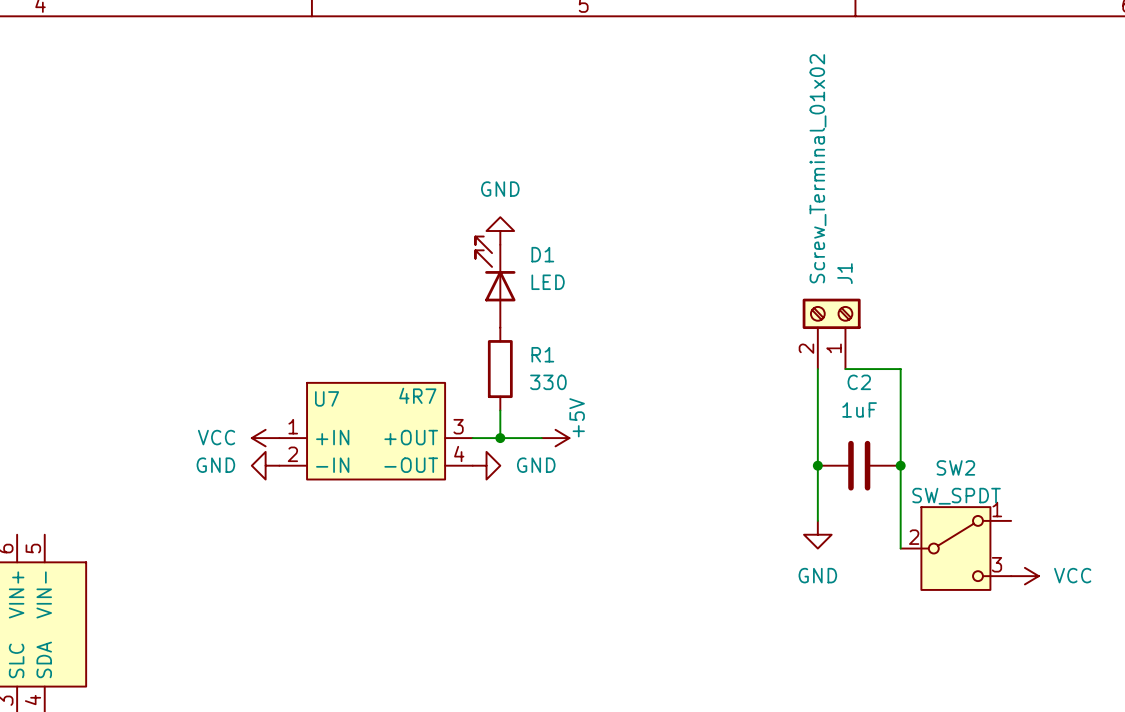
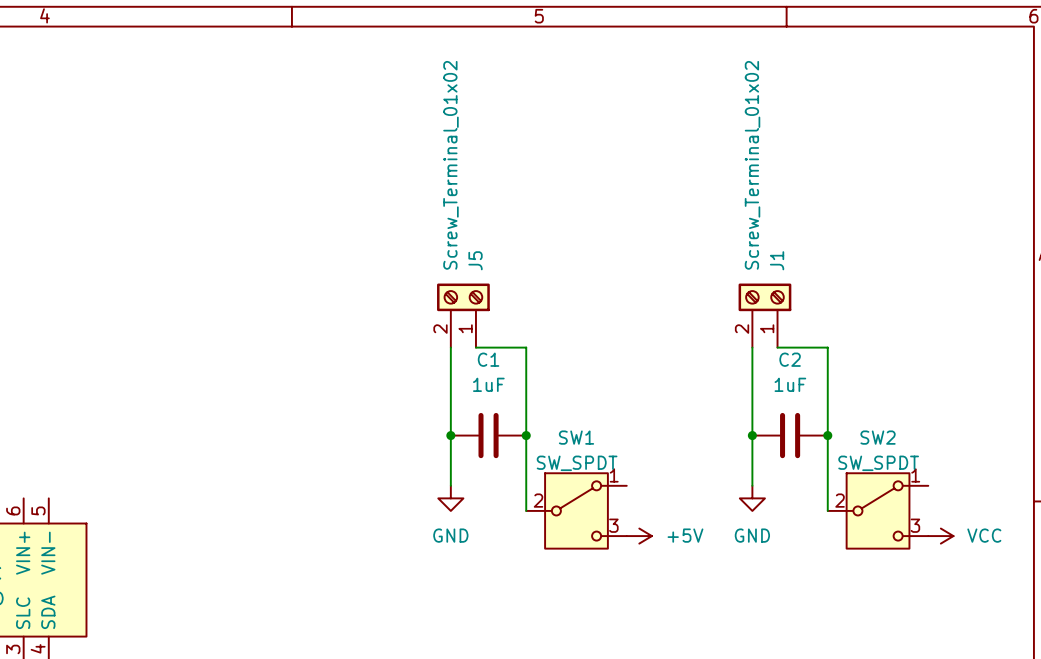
power symbol: GND (500, 231) -> none
D1: LED (495, 282) -> none
J5: none -> Screw_Terminal_01x02 (463, 315)
wire: none -> (450, 347) (450, 485)
R1: 330 (500, 369) -> none
wire: none -> (475, 347) (526, 347) (526, 510)
wire: (500, 410) (500, 438) -> none
power symbol text rotation: 0° (577, 417) -> 90° clockwise (685, 535)
U7: 4R7 (376, 431) -> none
power symbol: VCC (265, 438) -> none
wire: (472, 438) (541, 438) -> none
junction position: (500, 438) -> (450, 435)
power symbol position: +5V (555, 438) -> +5V (639, 536)
power symbol: GND (265, 465) -> none
power symbol rotation: 0° (486, 465) -> 90° clockwise (450, 498)
power symbol position: GND (486, 465) -> GND (450, 498)
C1: none -> 1uF (488, 435)
junction: none -> (526, 435)
SW1: none -> SW_SPDT (576, 510)

